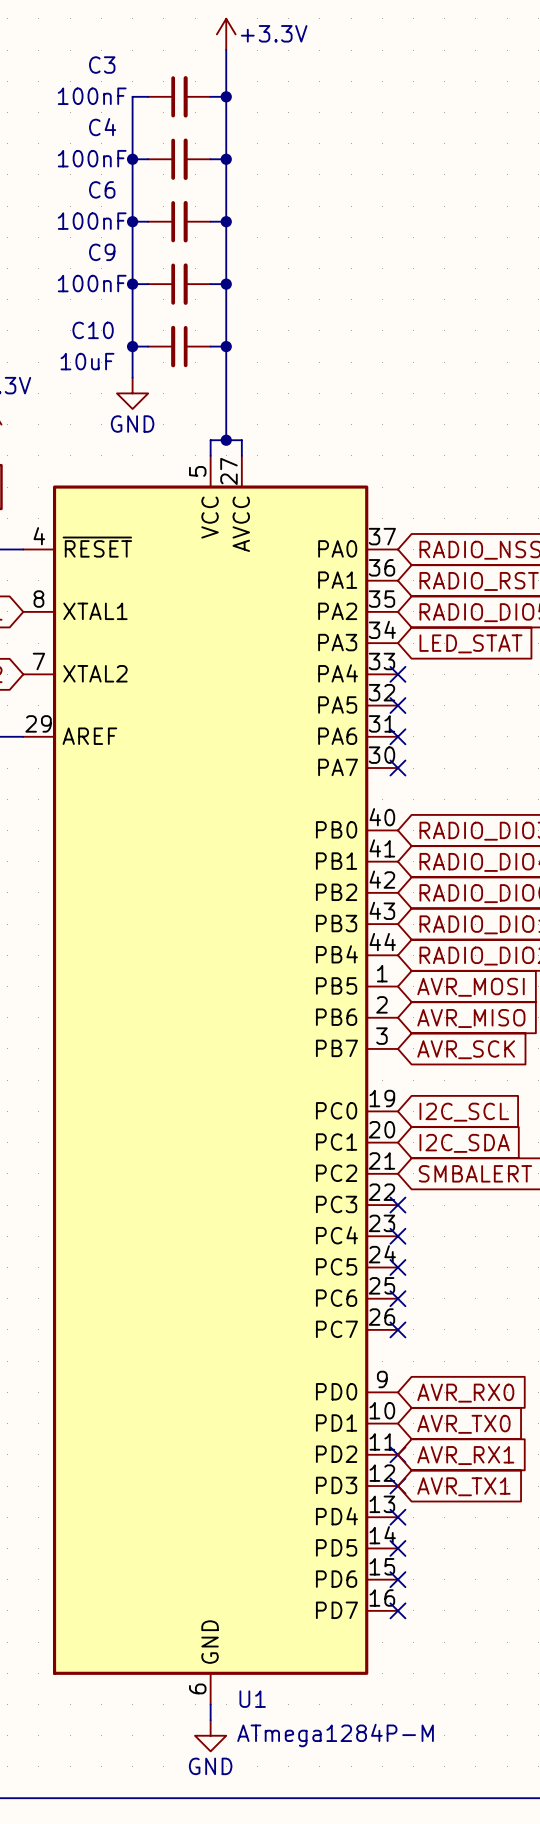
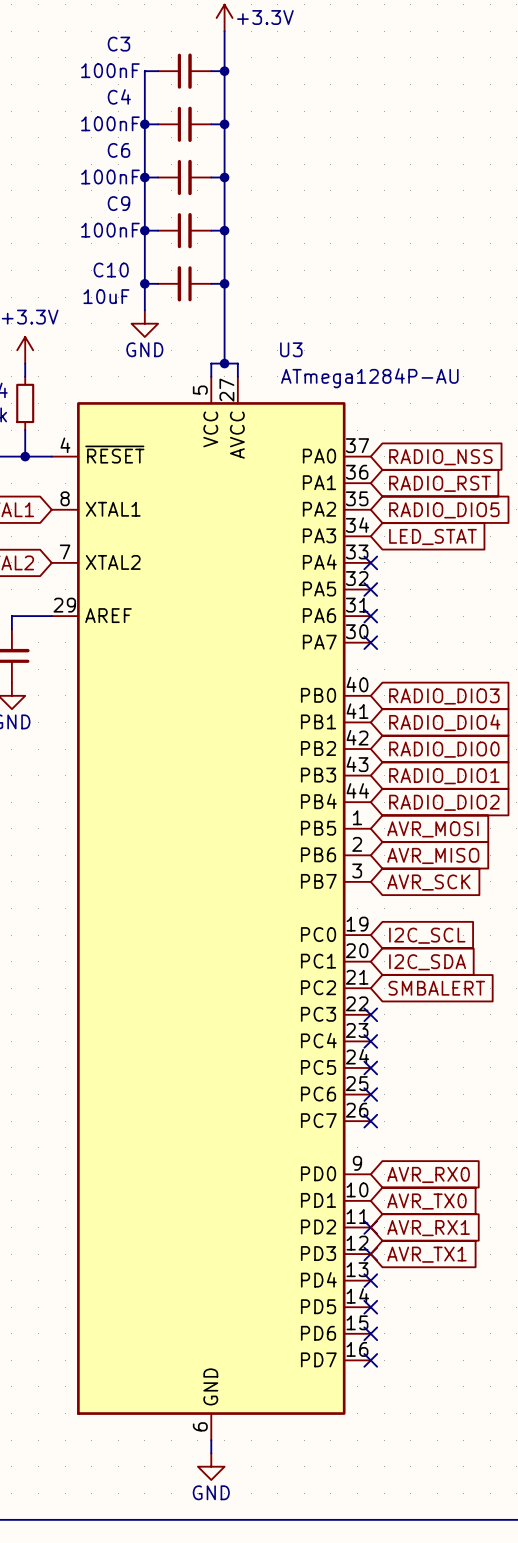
U1 name: U1 (252, 1699) -> U3 (291, 349)
U1 value: ATmega1284P-M (335, 1735) -> ATmega1284P-AU (369, 378)

